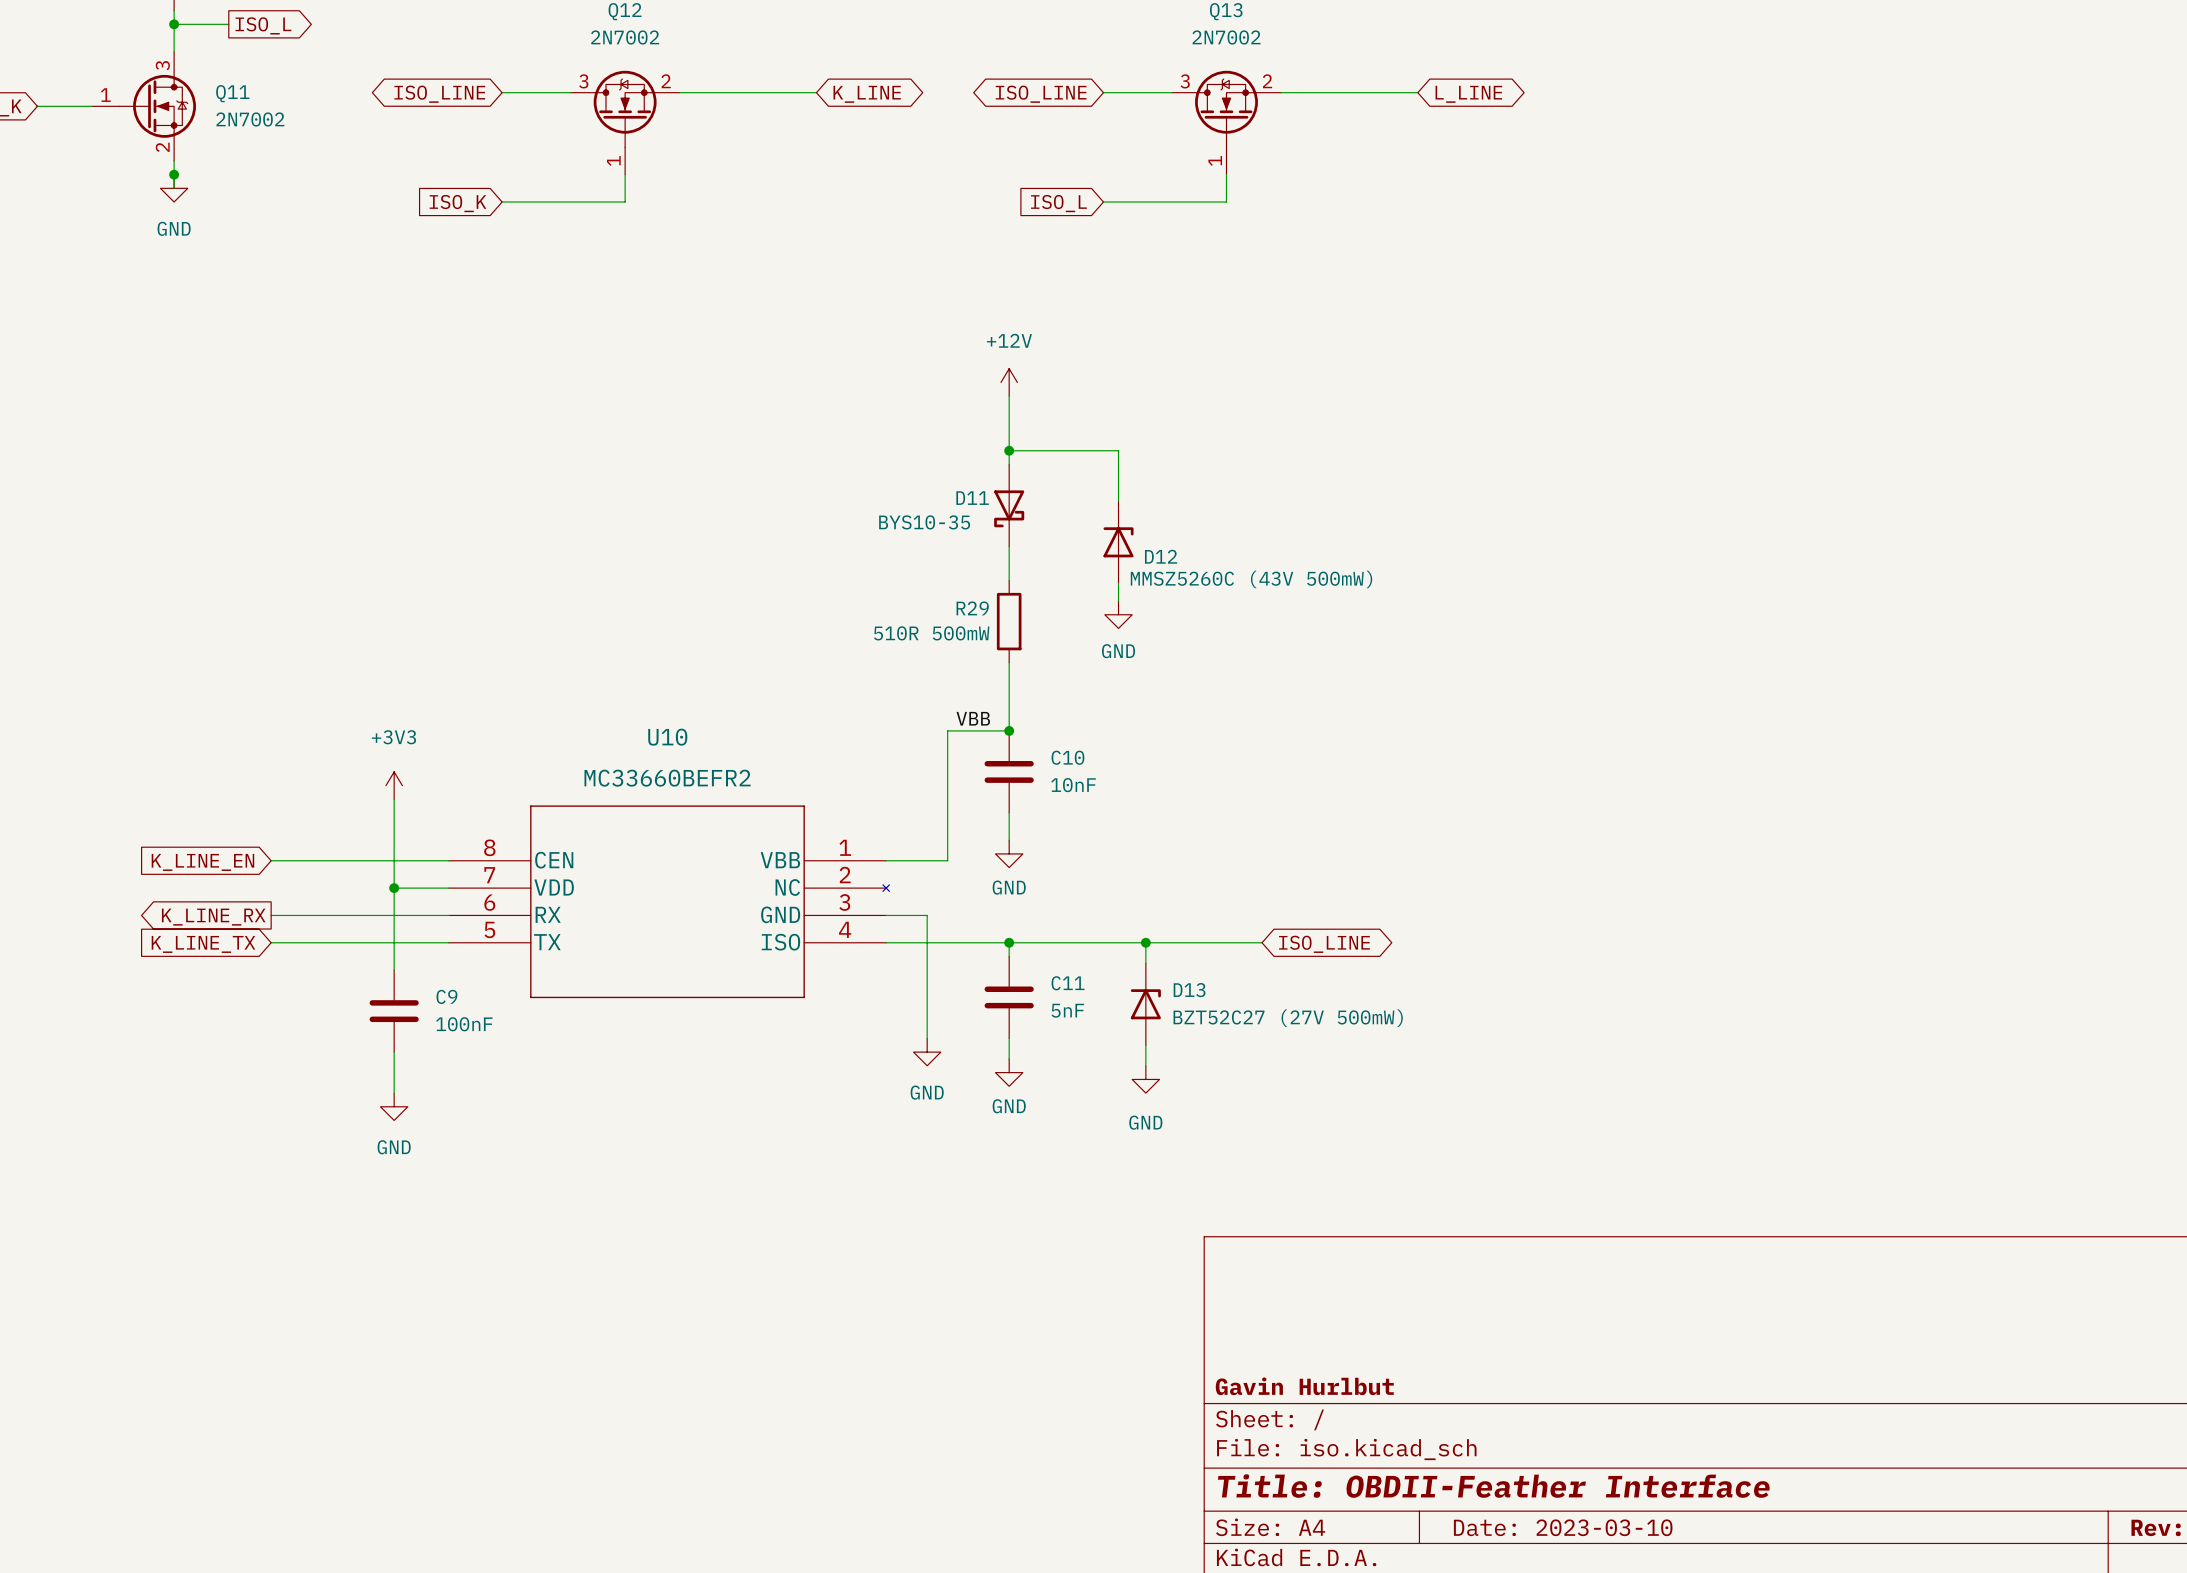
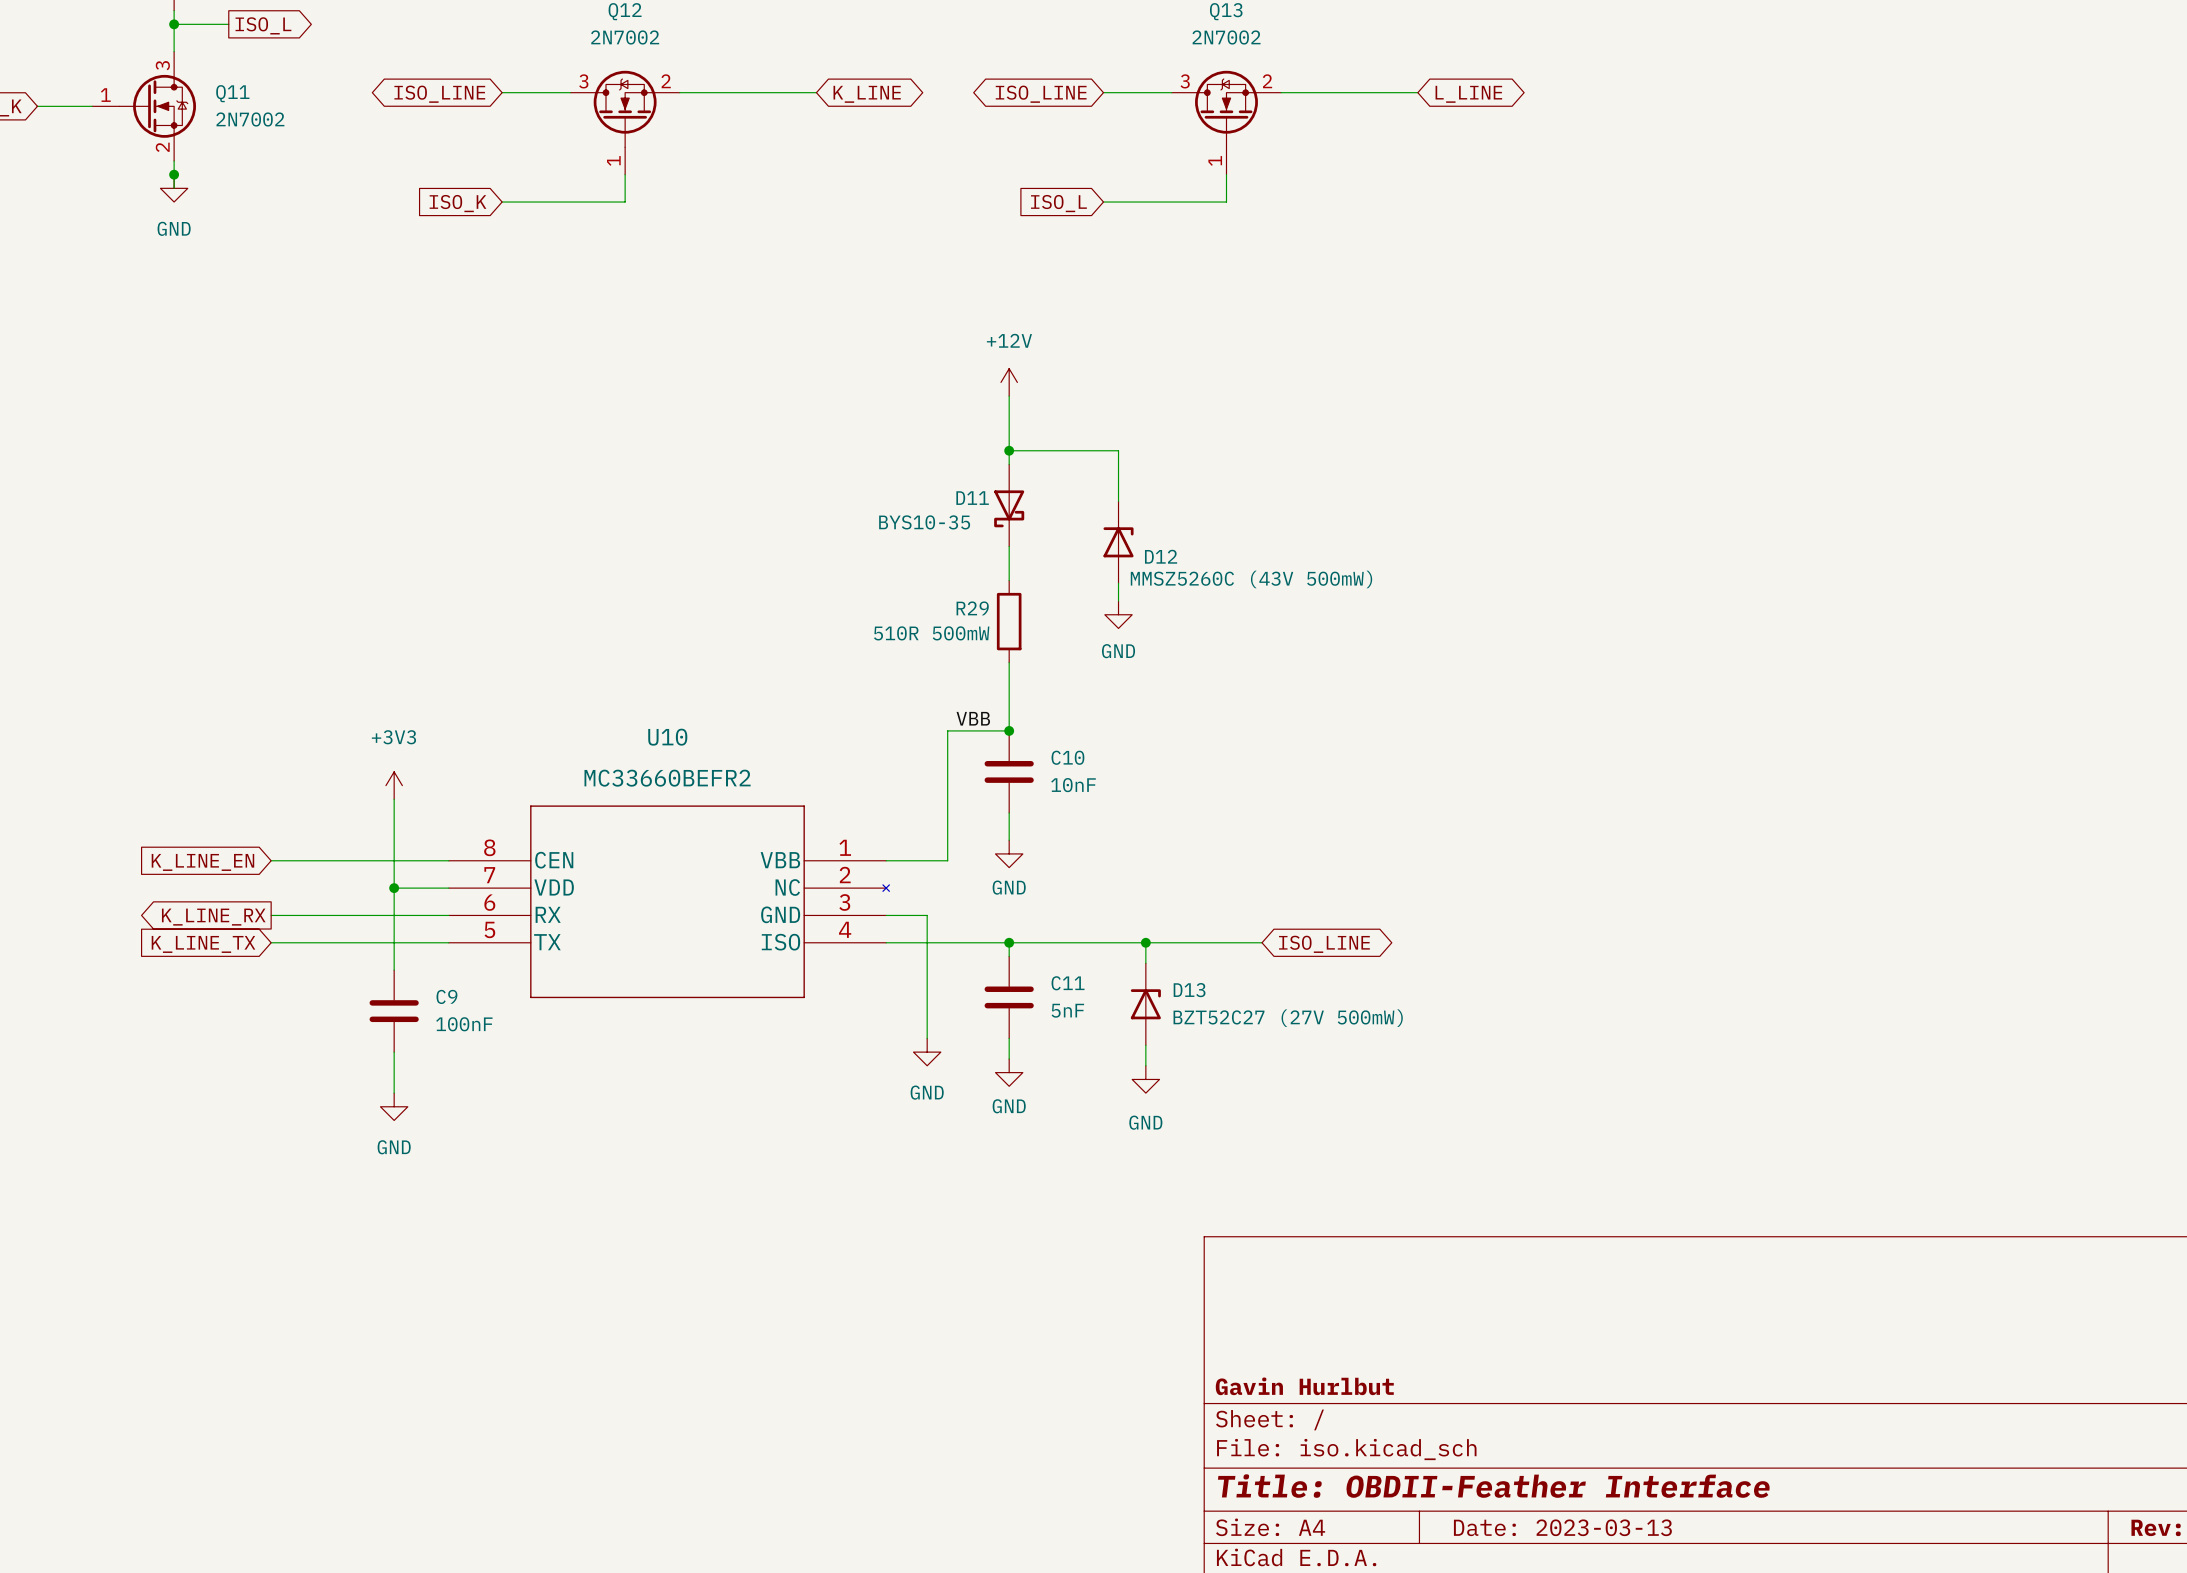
title block: Date: 2023-03-10 (1563, 1527) -> Date: 2023-03-13 (1562, 1527)

